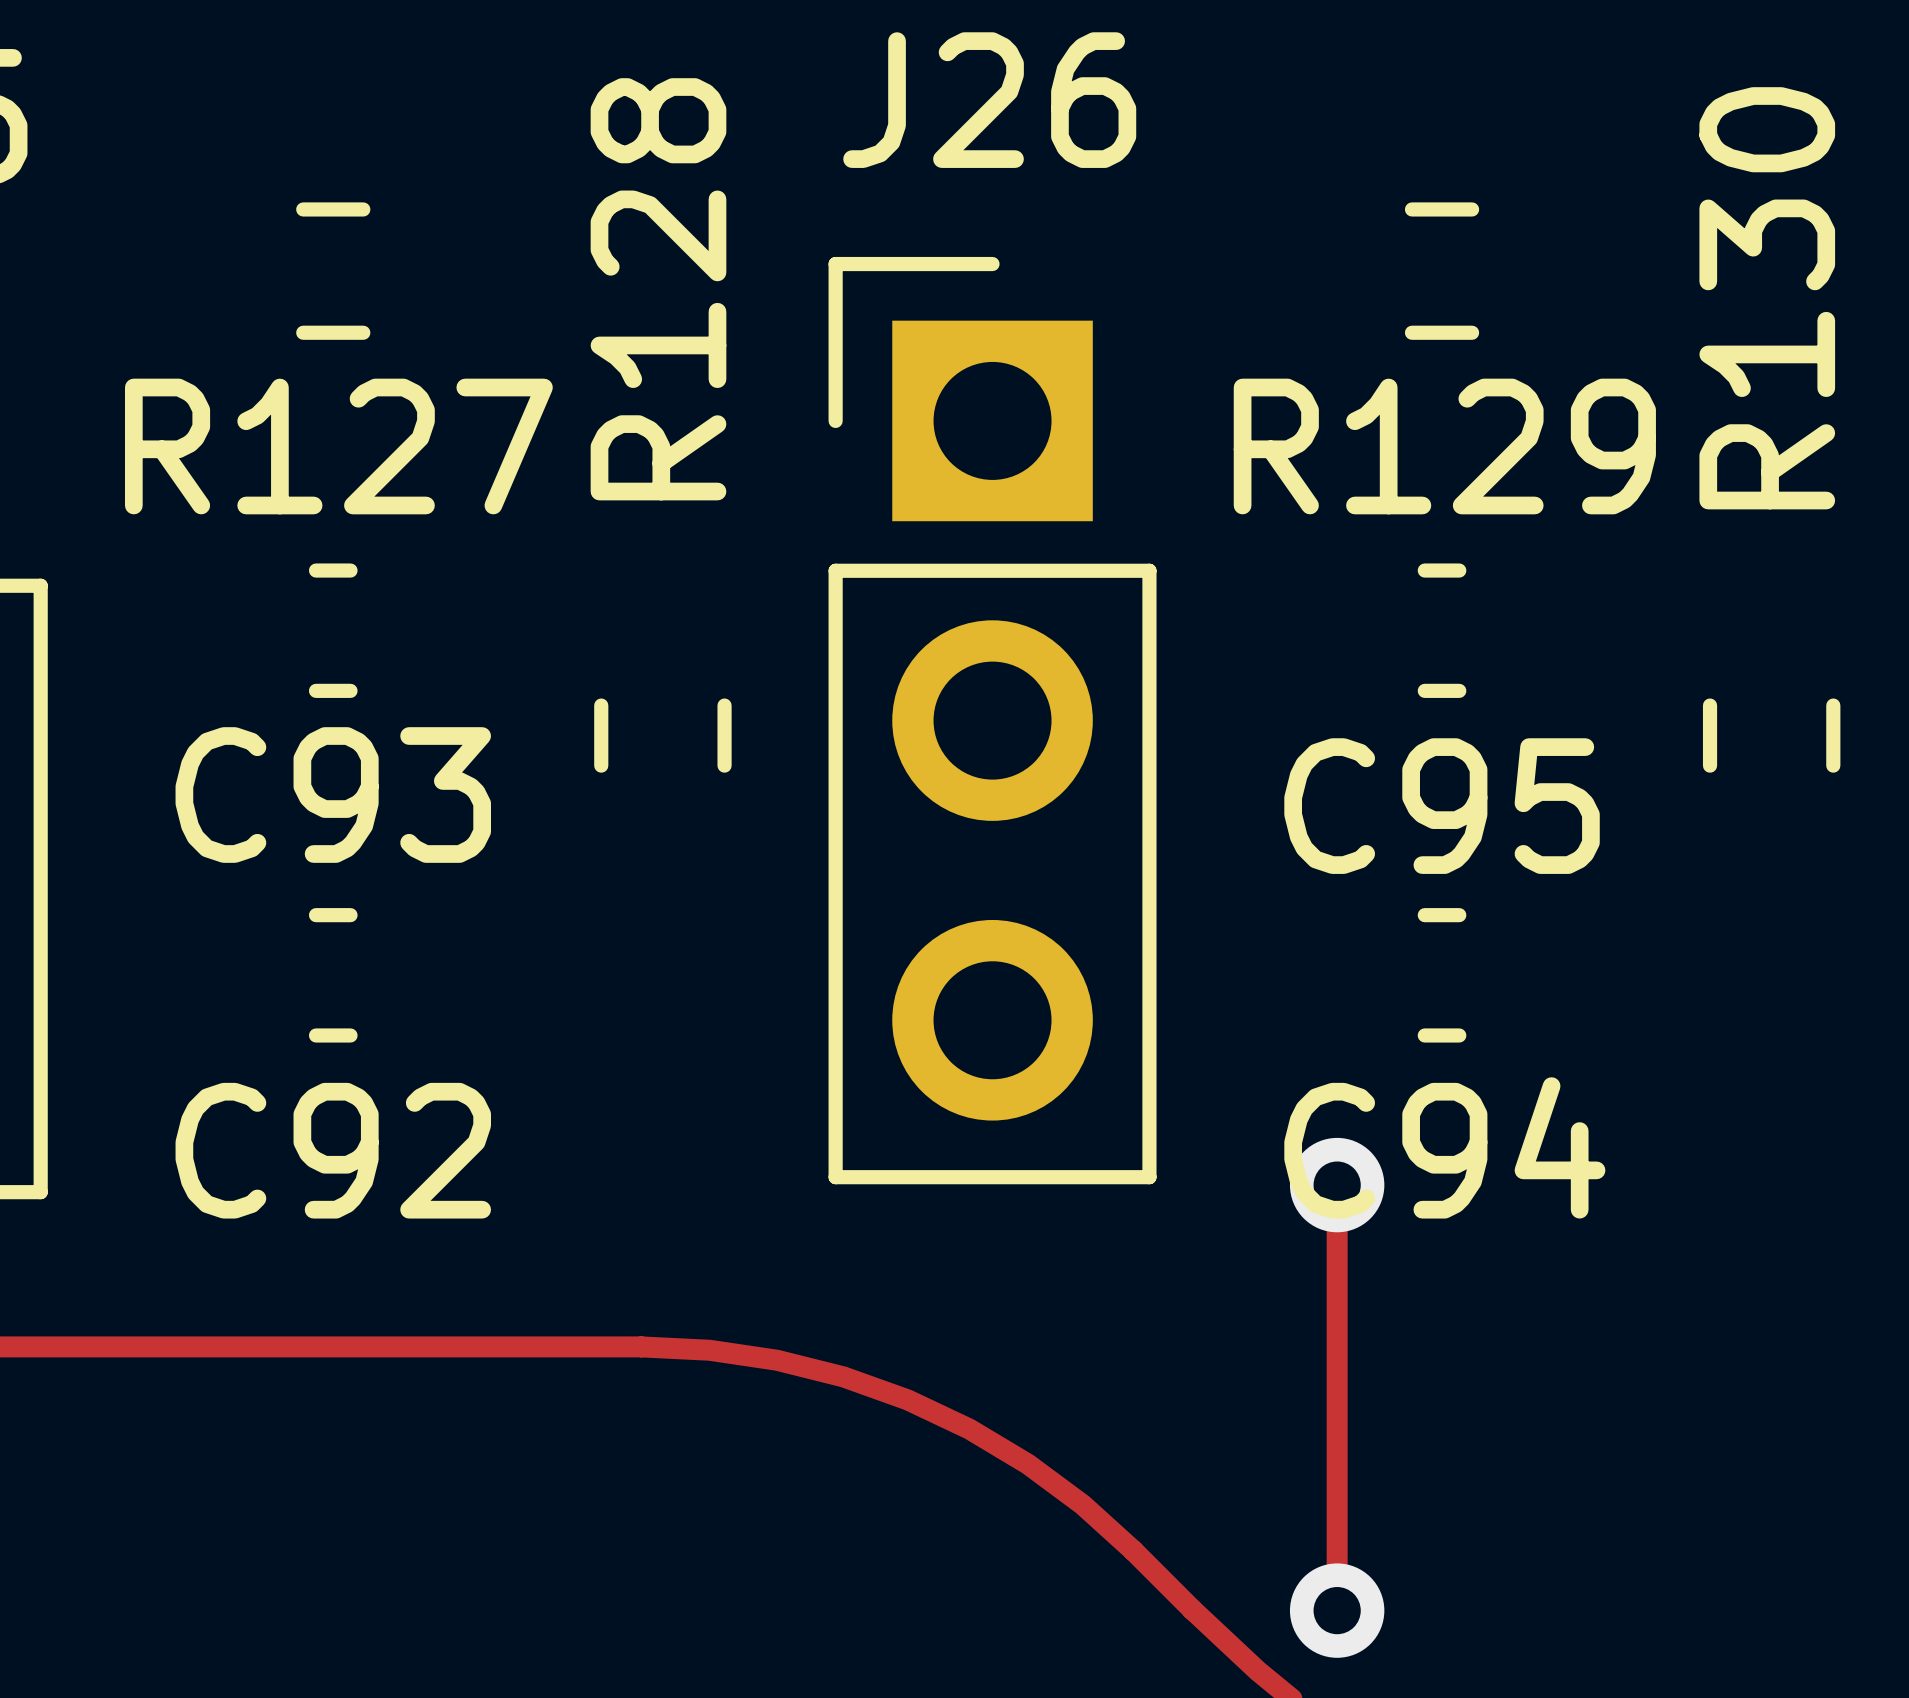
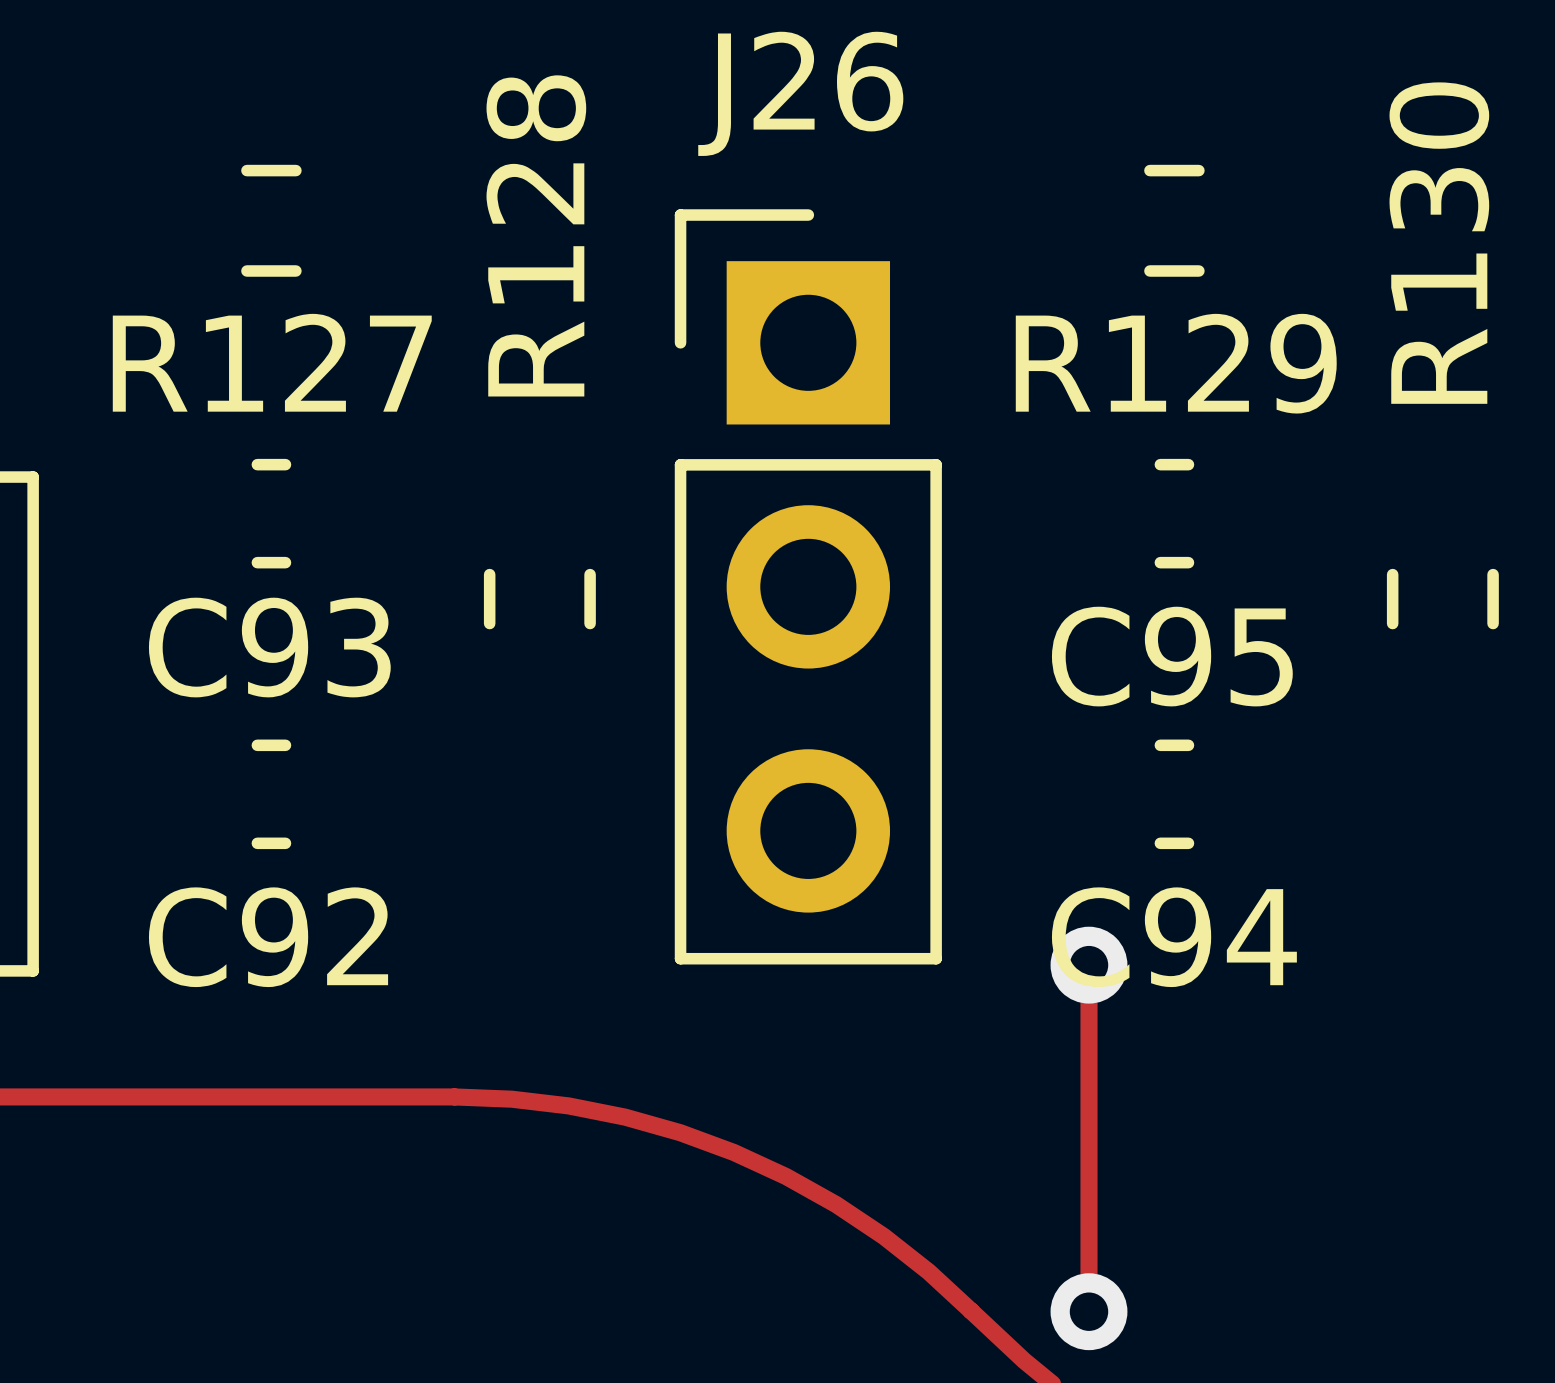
track: (558, 1346) (641, 1346) (709, 1350) (777, 1360) (843, 1376) (907, 1399) (969, 1429) (1027, 1464) (1082, 1504) (1133, 1550) (1192, 1609) -> (454, 1096) (511, 1099) (568, 1105) (625, 1117) (680, 1132) (734, 1152) (786, 1176) (836, 1204) (883, 1236) (928, 1271) (971, 1310)

